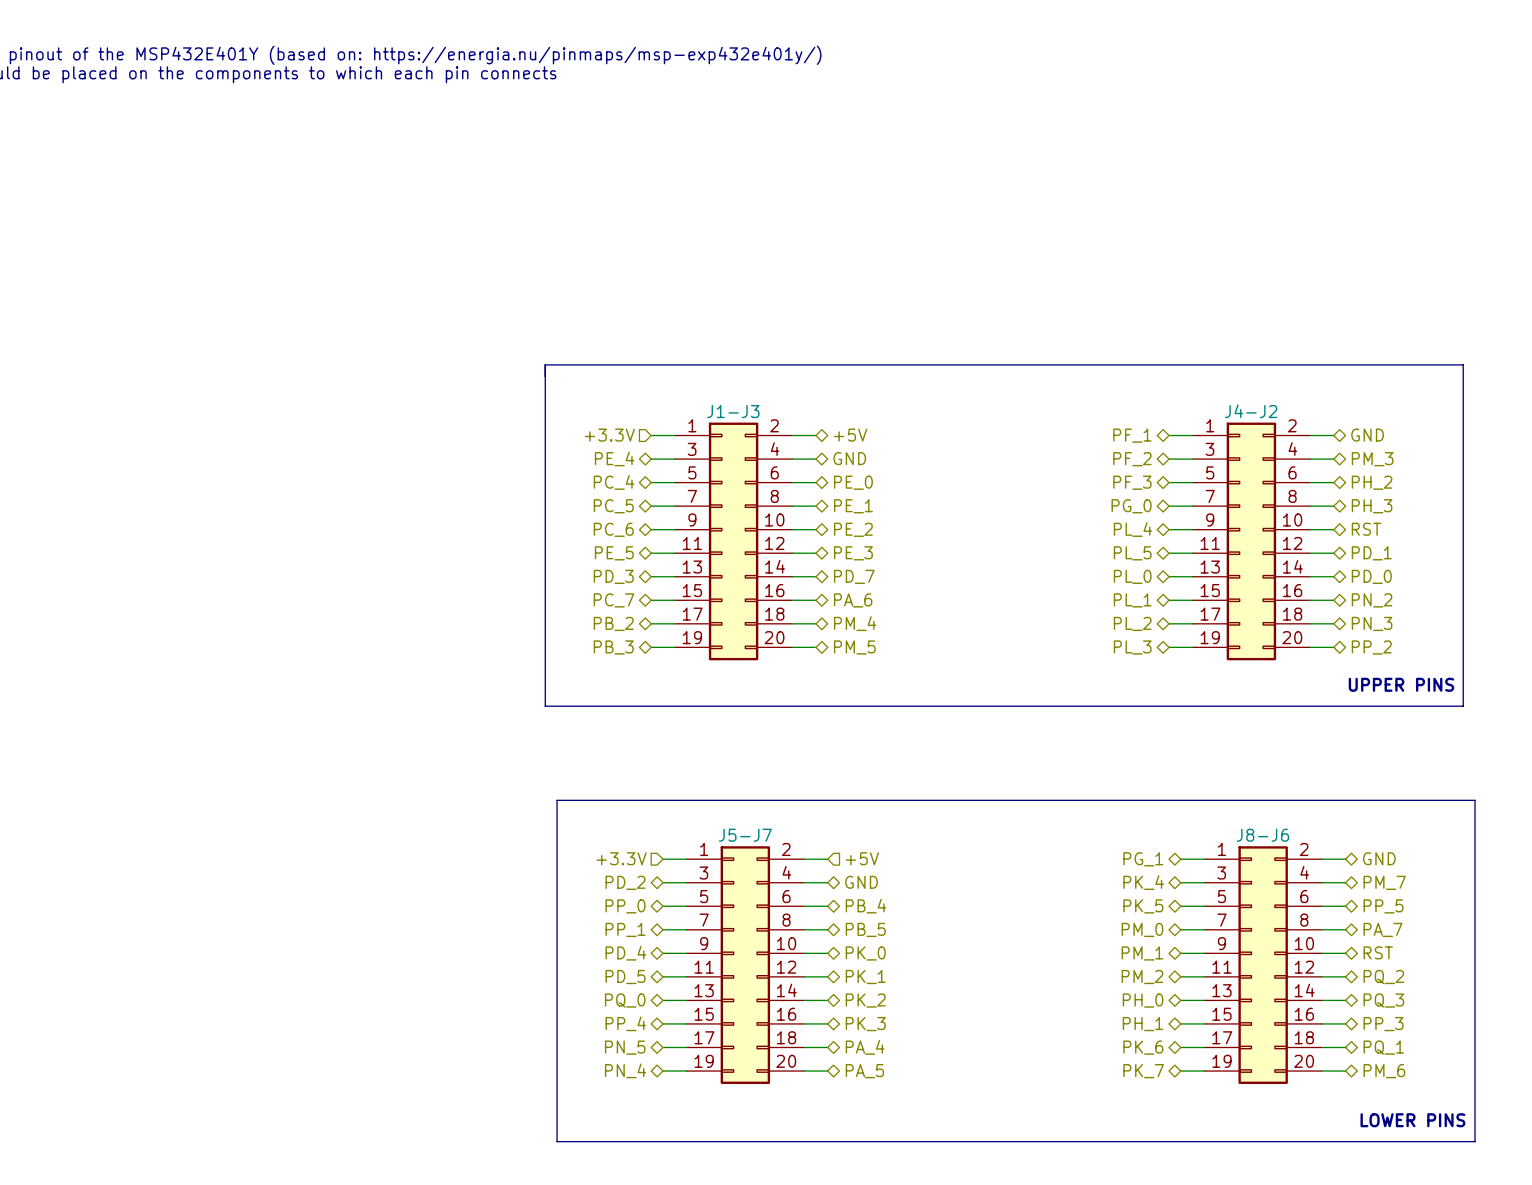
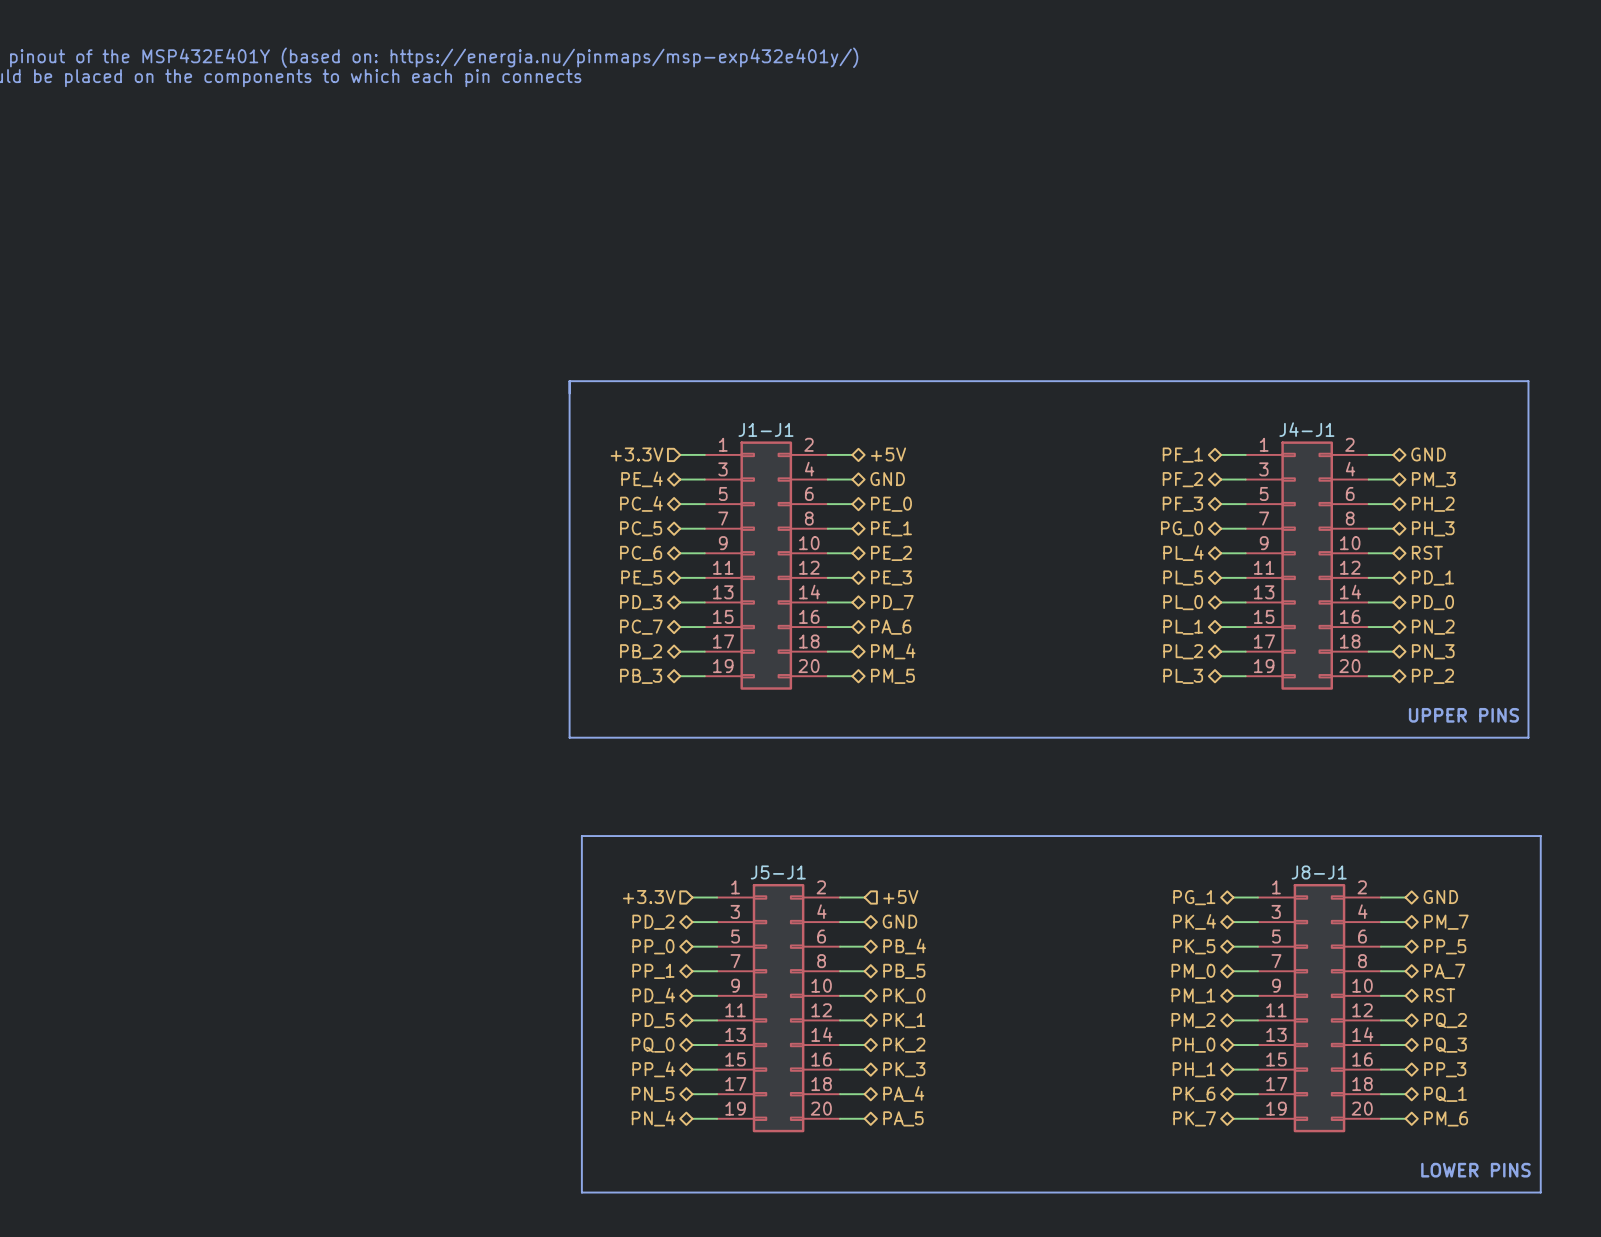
J1-J3 name: J1-J3 (733, 411) -> J1-J1 (765, 429)
J4-J2 name: J4-J2 (1251, 411) -> J4-J1 (1306, 429)
J5-J7 name: J5-J7 (745, 835) -> J5-J1 (778, 872)
J8-J6 name: J8-J6 (1262, 835) -> J8-J1 (1319, 872)

